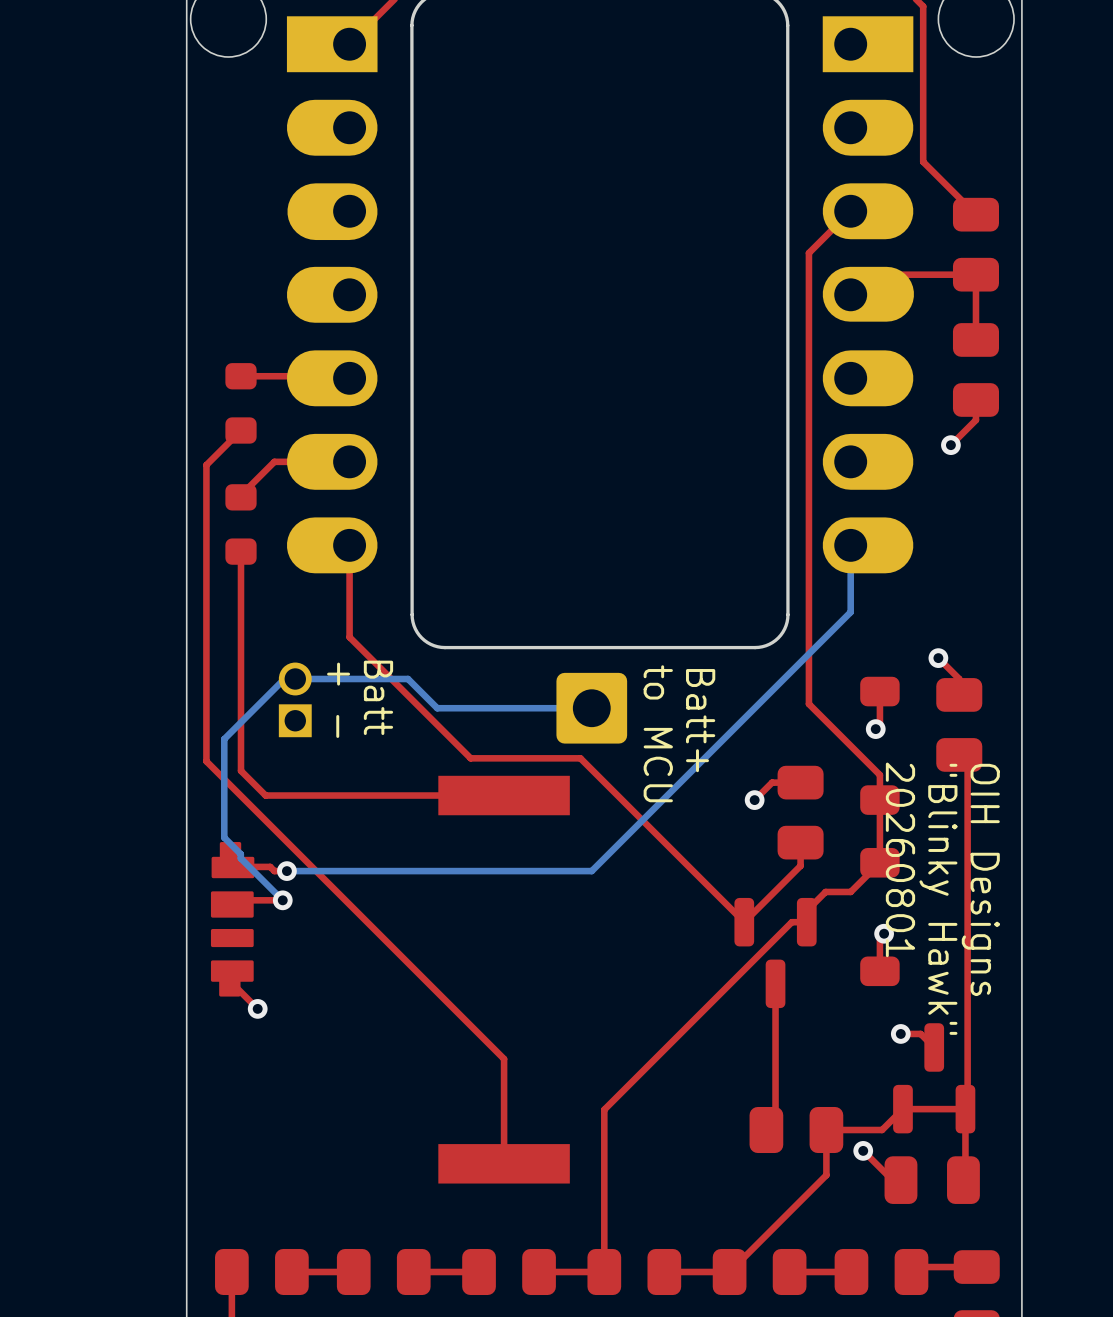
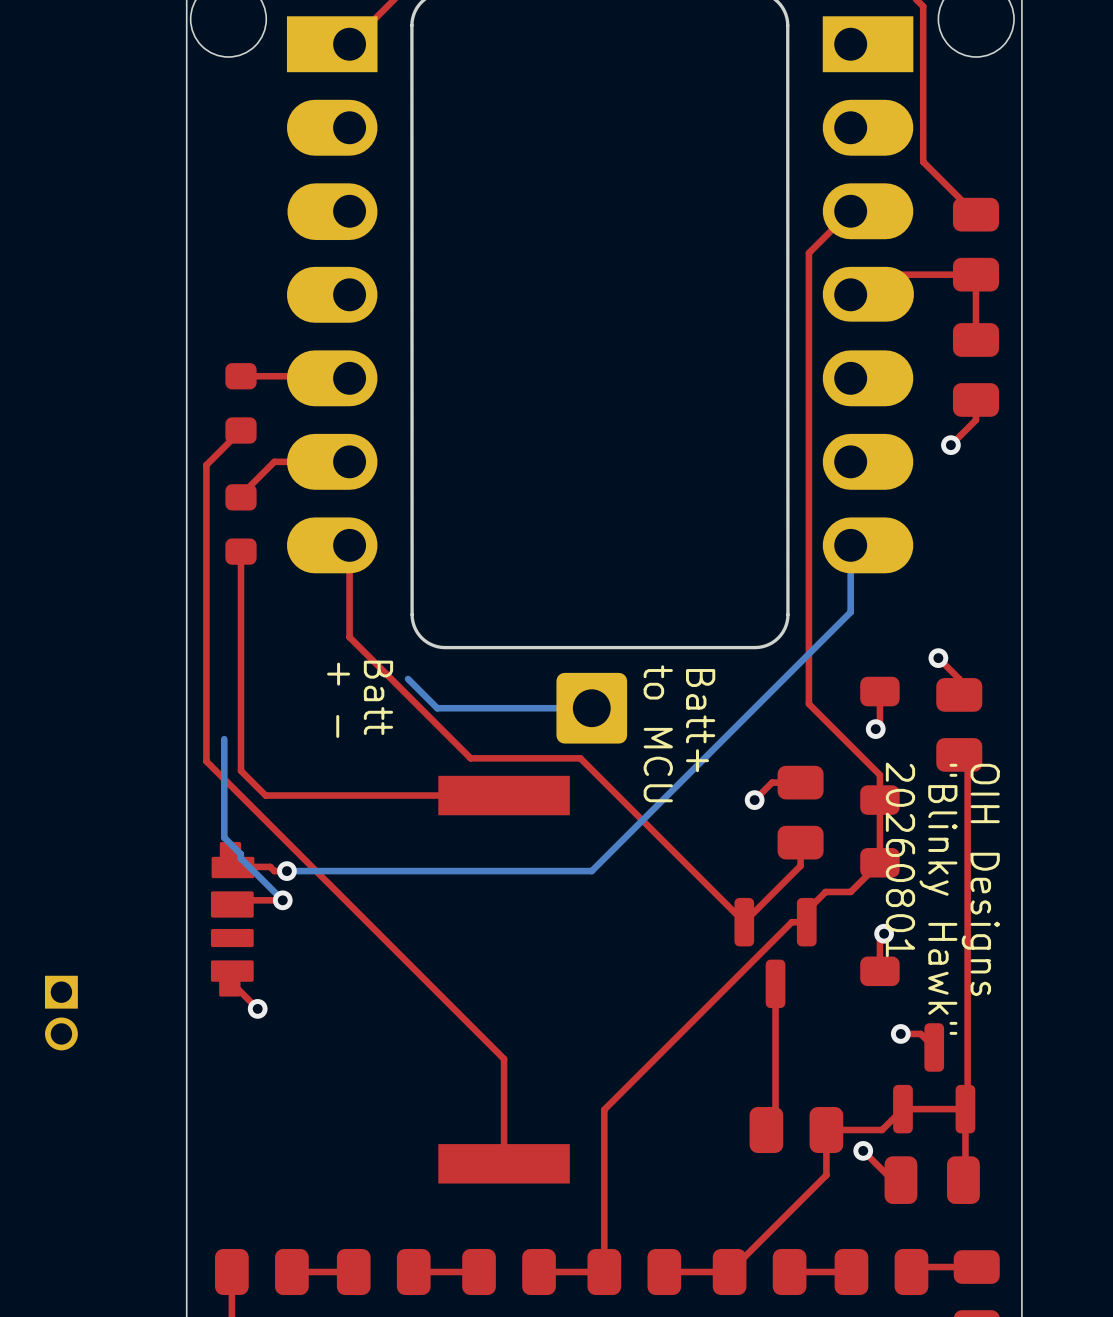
bottom track: (408, 678) (284, 678) (224, 739) -> none
part rotation: 0° (295, 699) -> 180° (61, 1013)
part position: (295, 699) -> (61, 1013)

